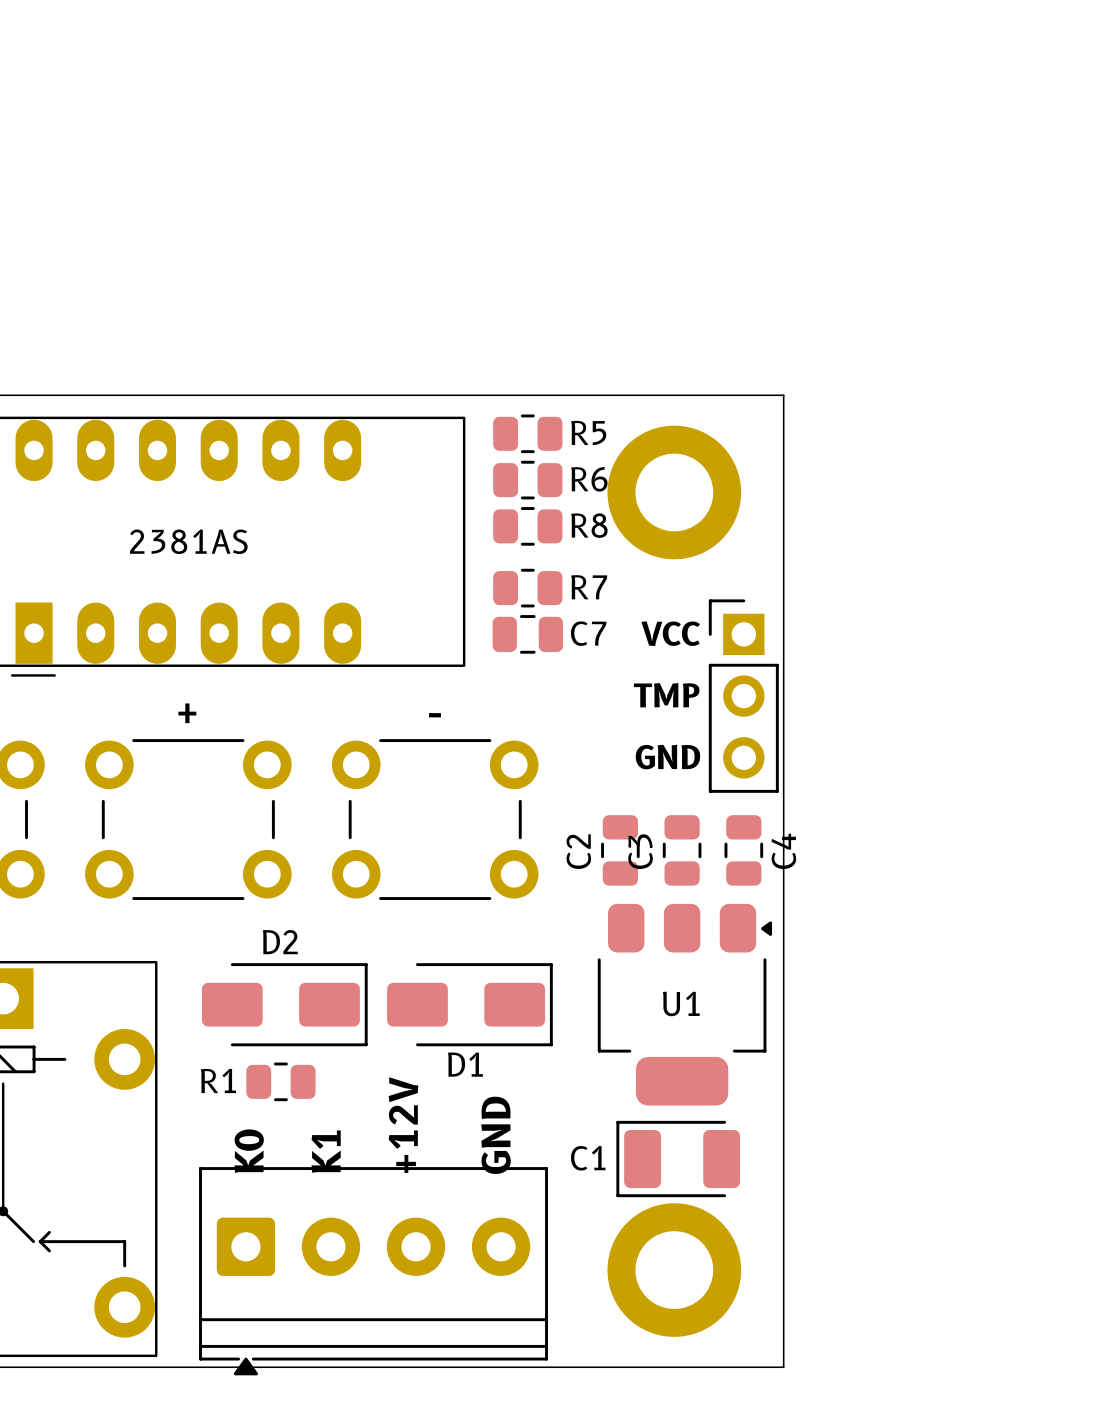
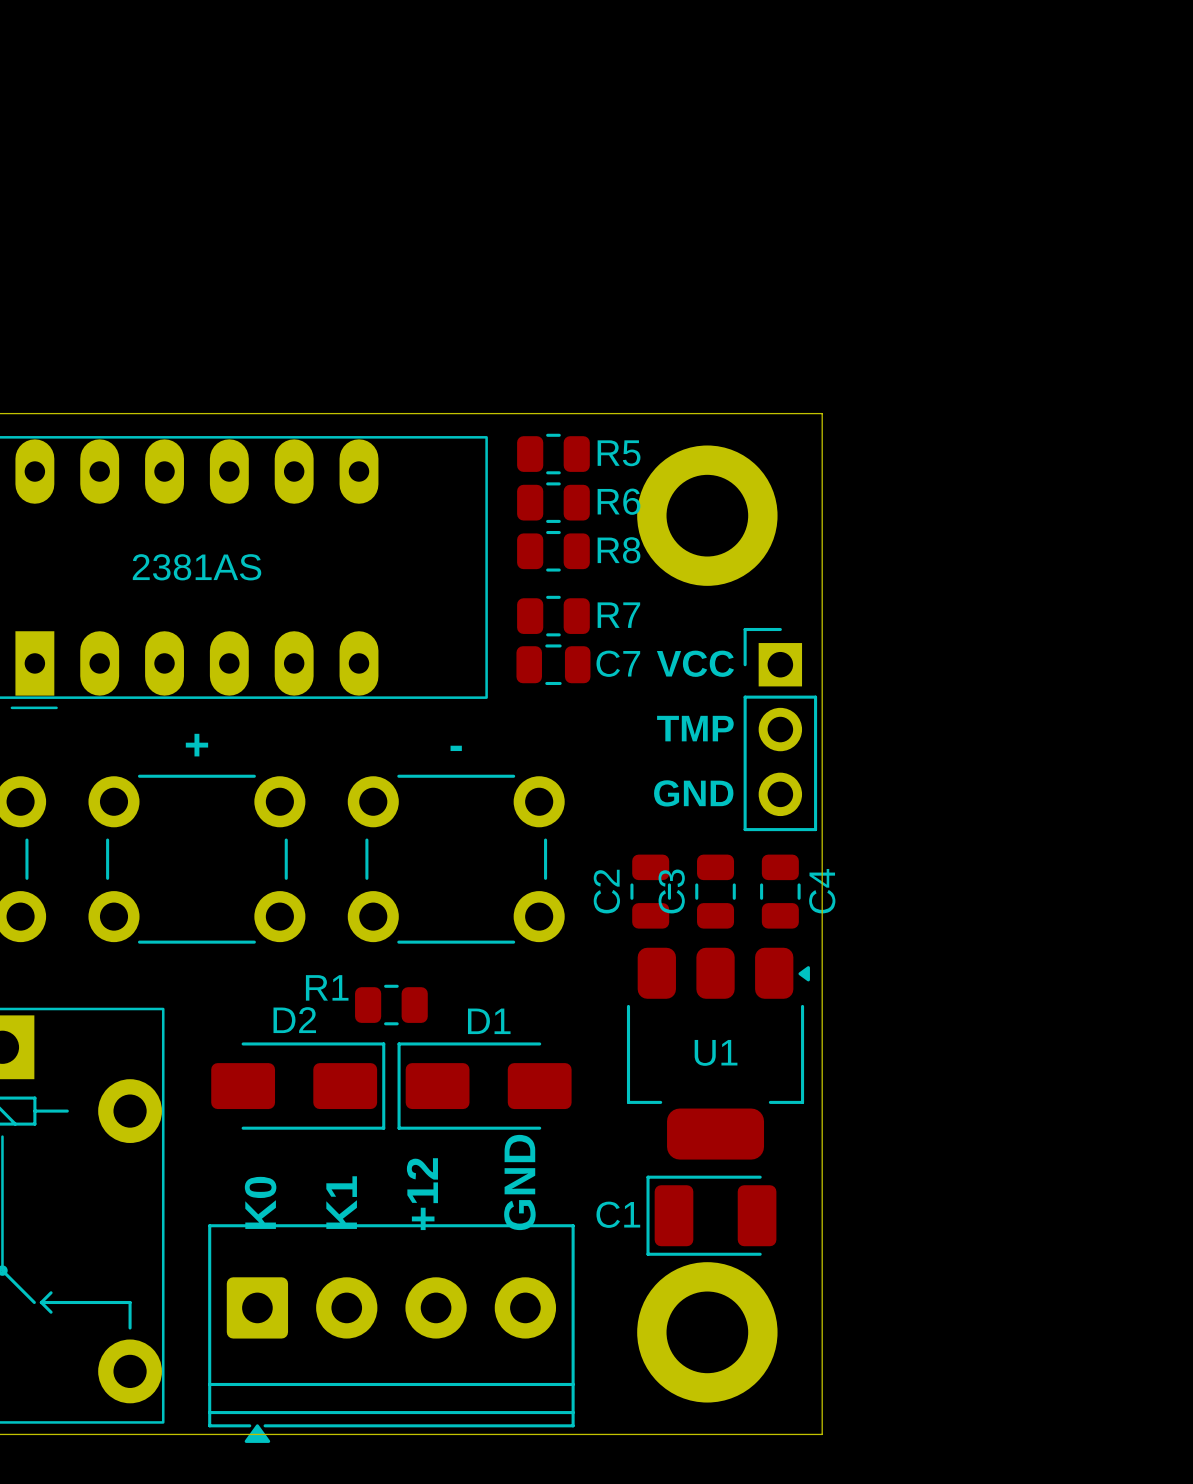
D2 position: (284, 1004) -> (298, 1086)
D1 rotation: 0° (469, 1004) -> 180° (484, 1086)
R1 name position: R1 (218, 1080) -> R1 (327, 987)
R1 position: (280, 1081) -> (391, 1005)
text: +12V (403, 1125) -> +12 (422, 1194)

